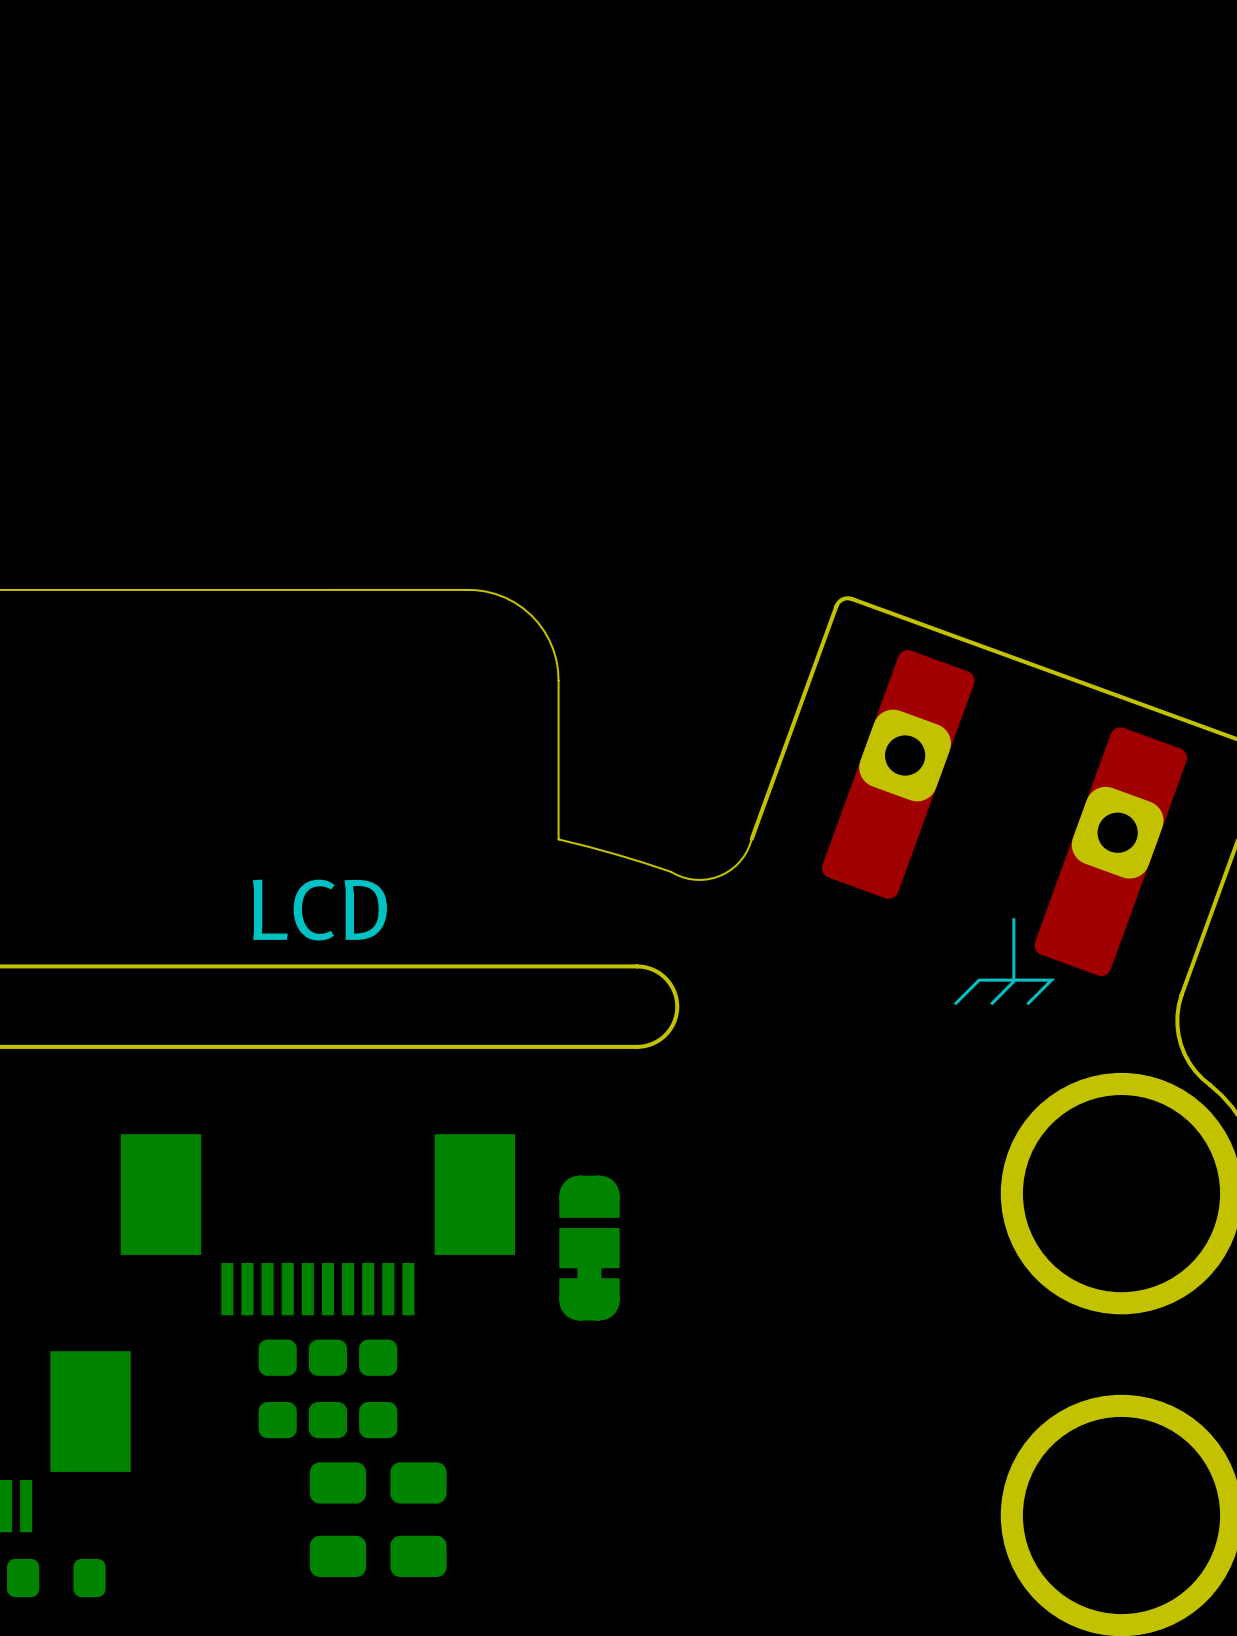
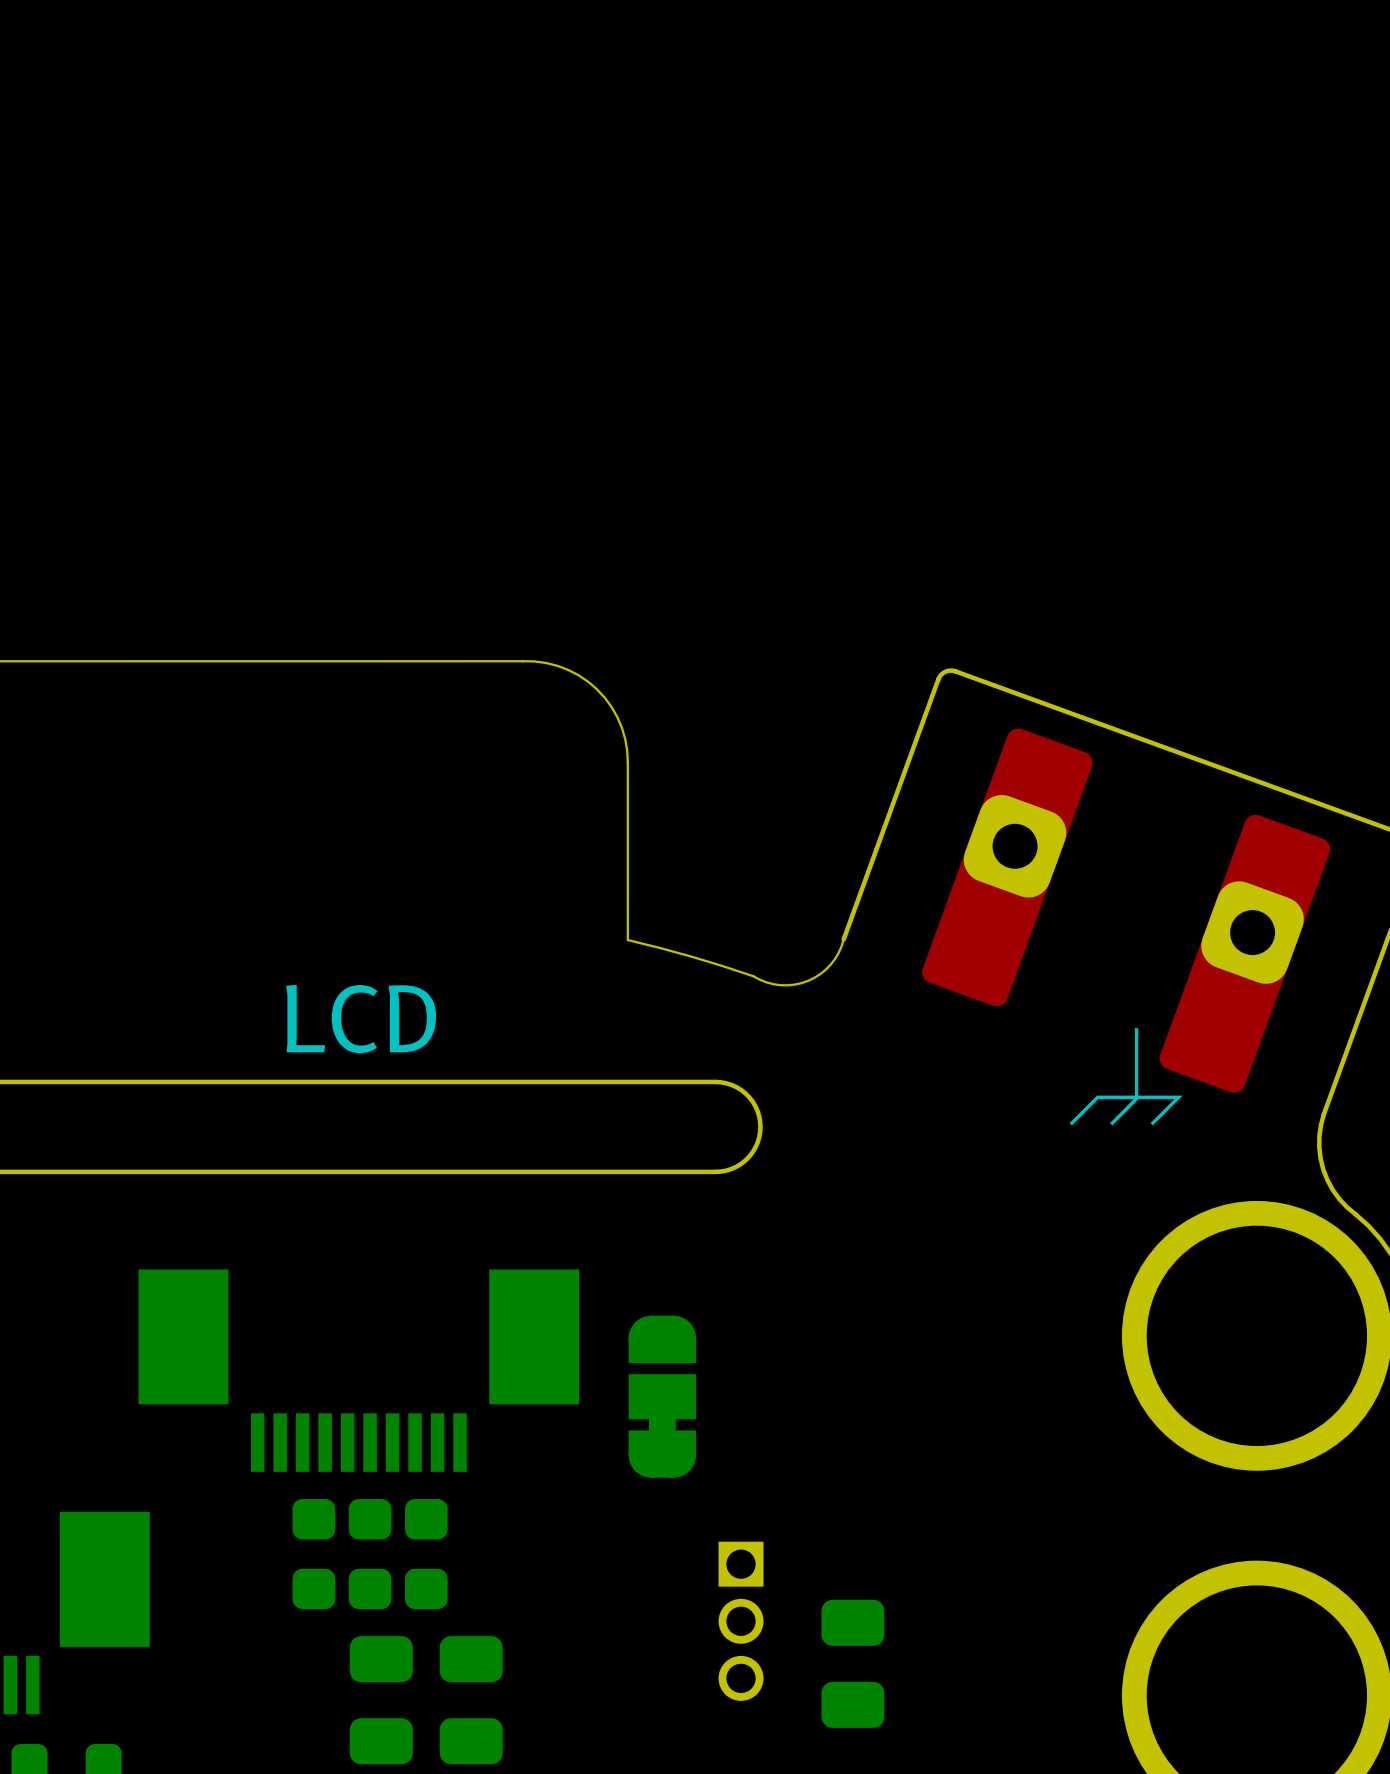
part: none -> (741, 1621)
part: none -> (852, 1663)

